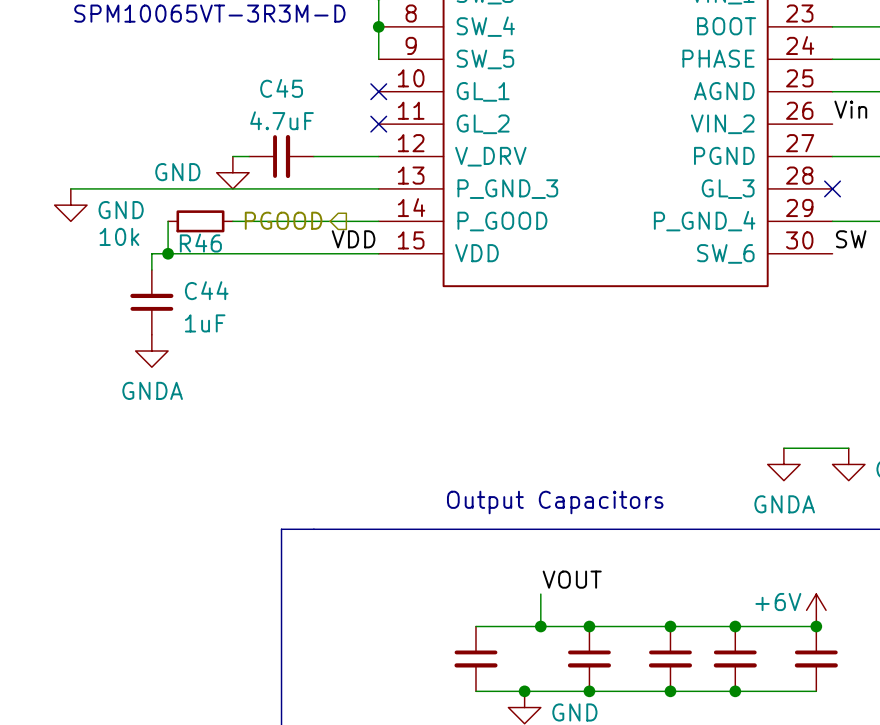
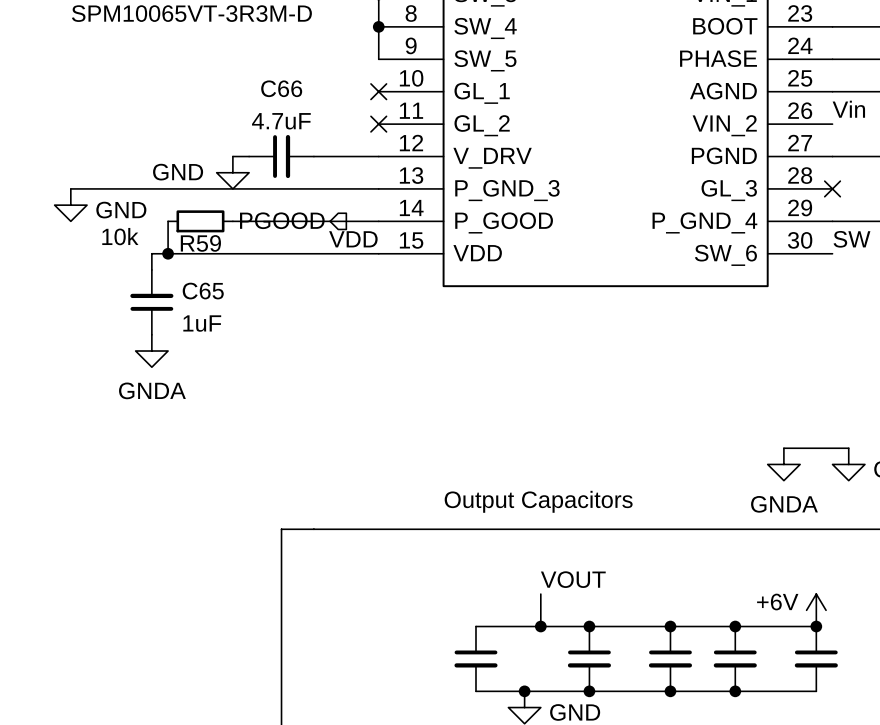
C45 name: C45 (281, 88) -> C66 (281, 88)
R46 name: R46 (200, 243) -> R59 (200, 243)
C44 name: C44 (206, 290) -> C65 (203, 291)

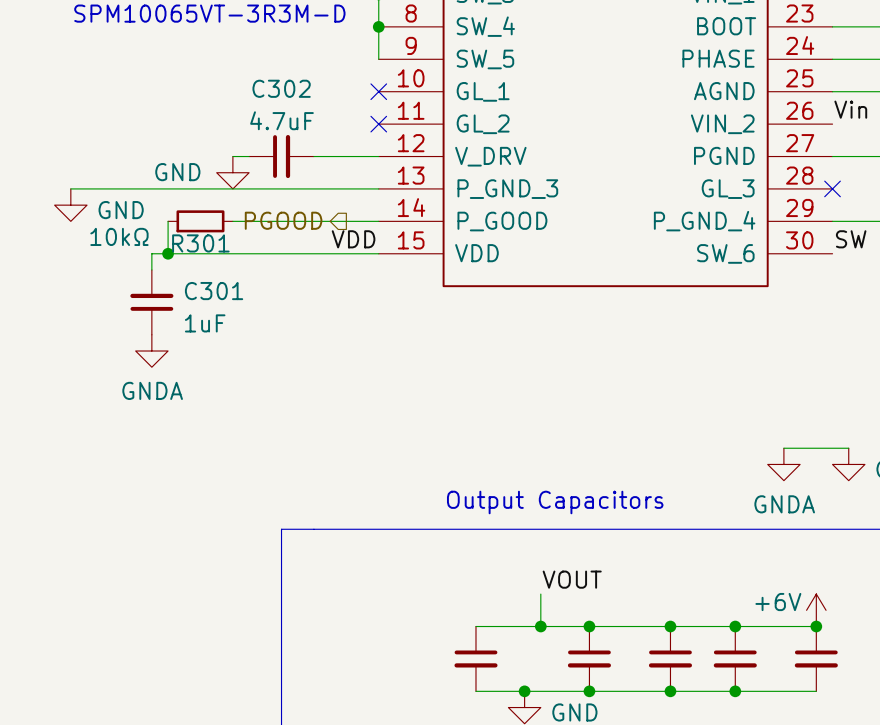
C66 name: C66 (281, 88) -> C302 (281, 88)
R59 value: 10k (120, 236) -> 10kΩ (119, 236)
R59 name: R59 (200, 243) -> R301 (200, 243)
C65 name: C65 (203, 291) -> C301 (214, 291)

